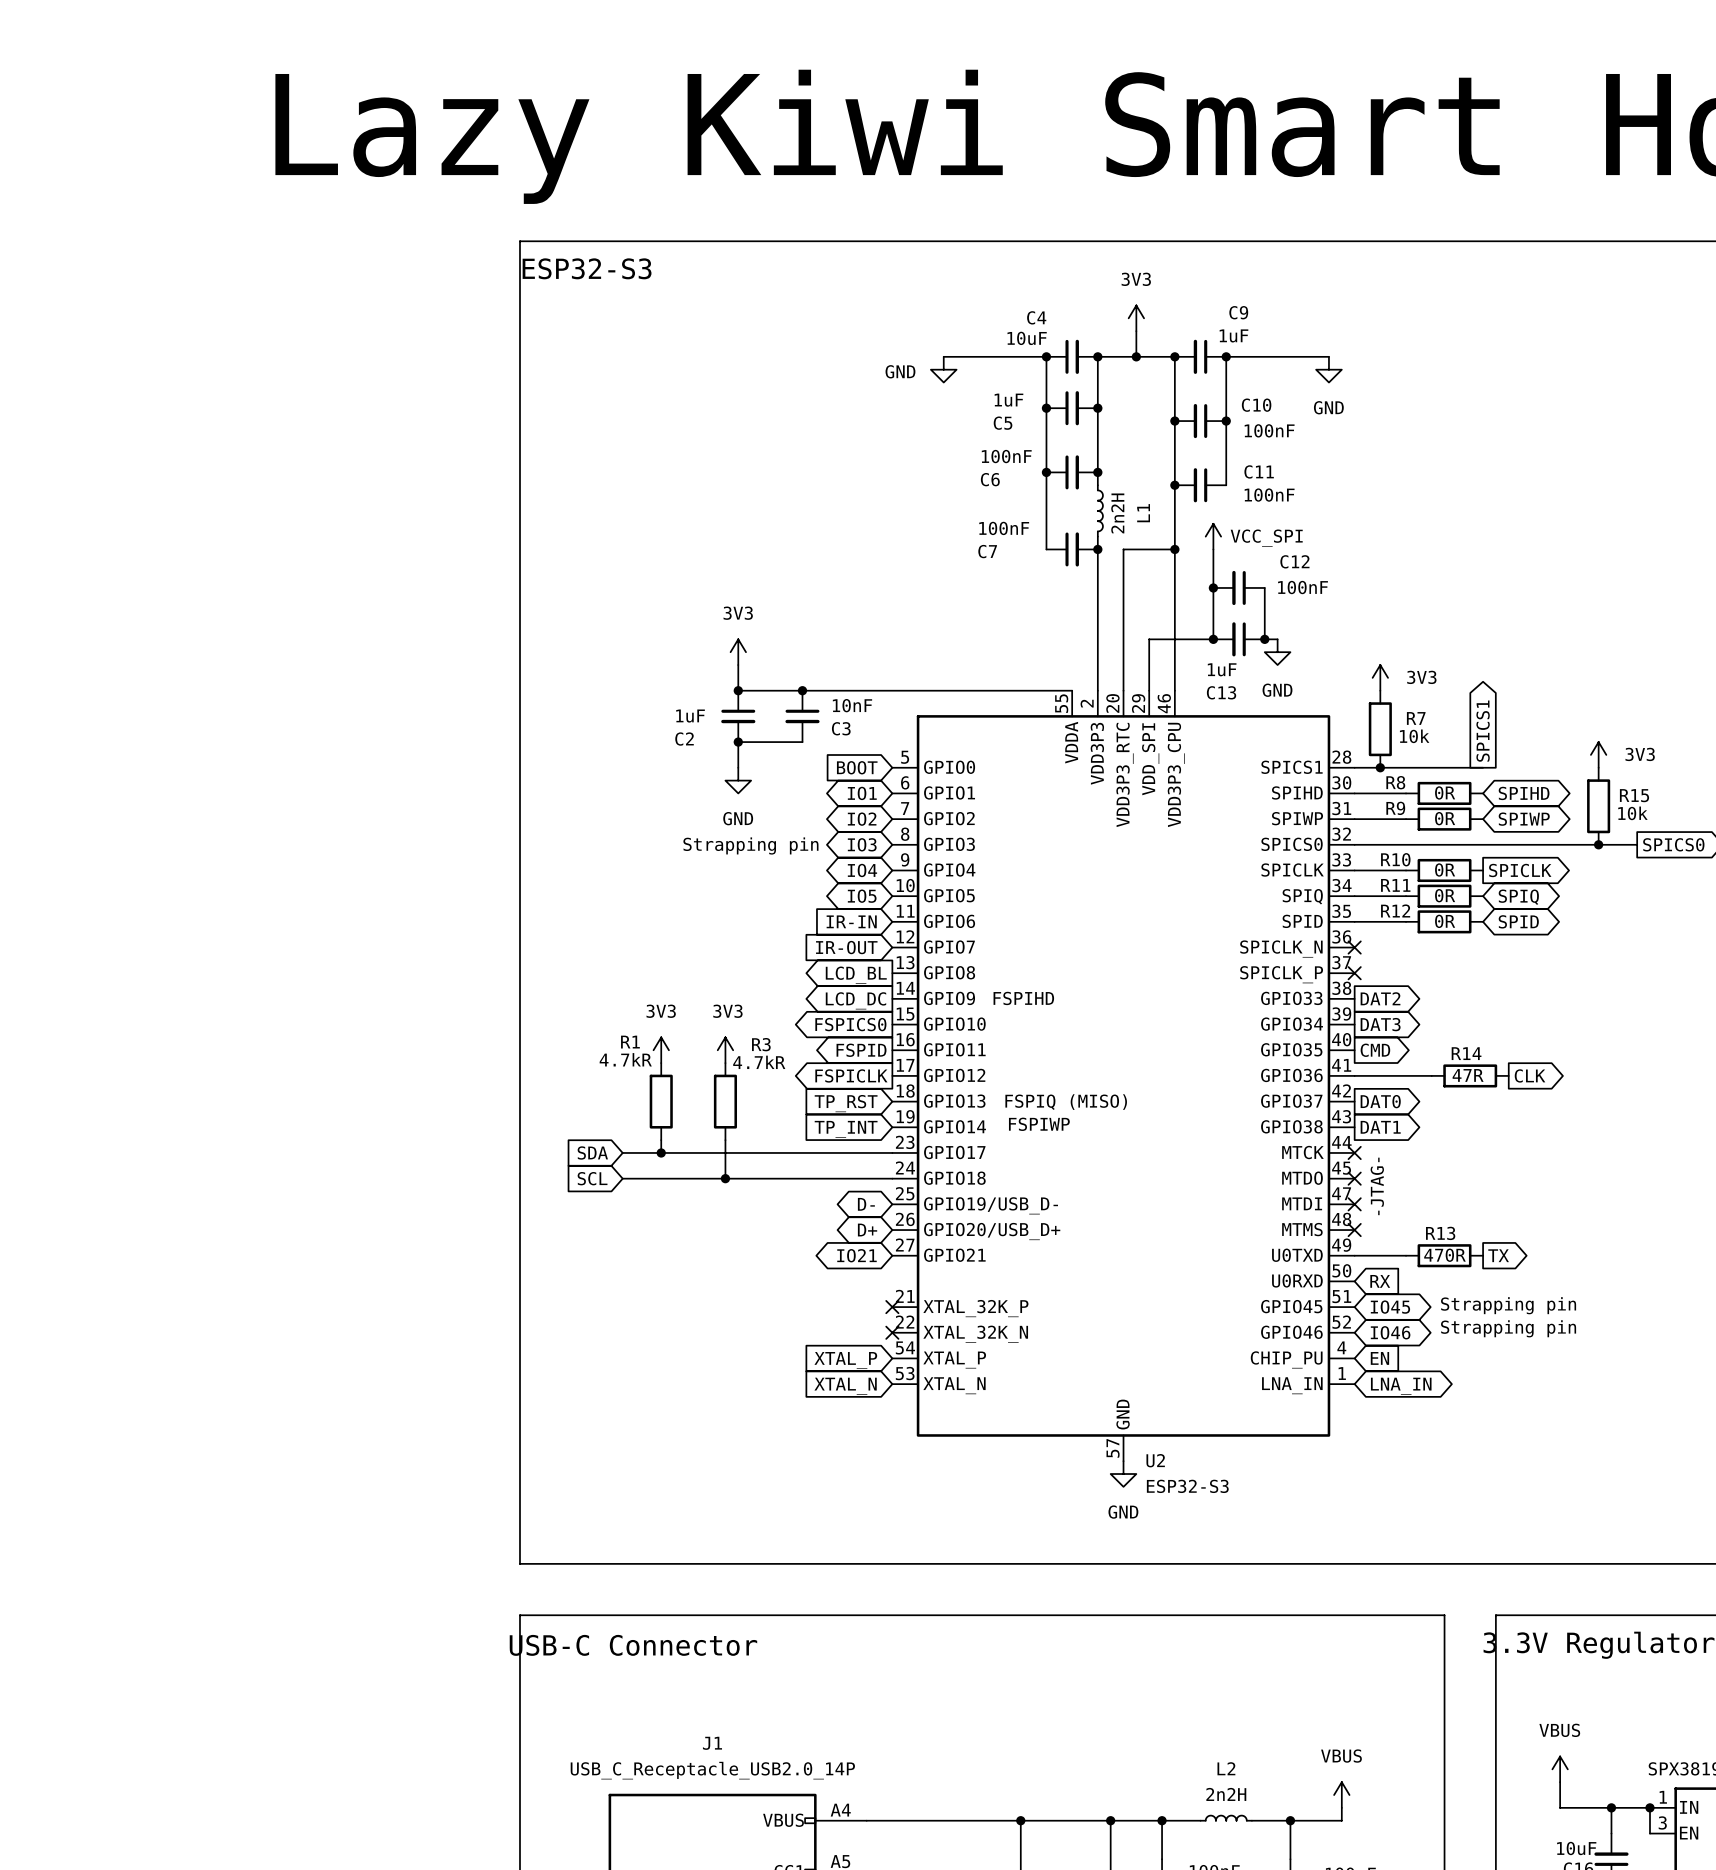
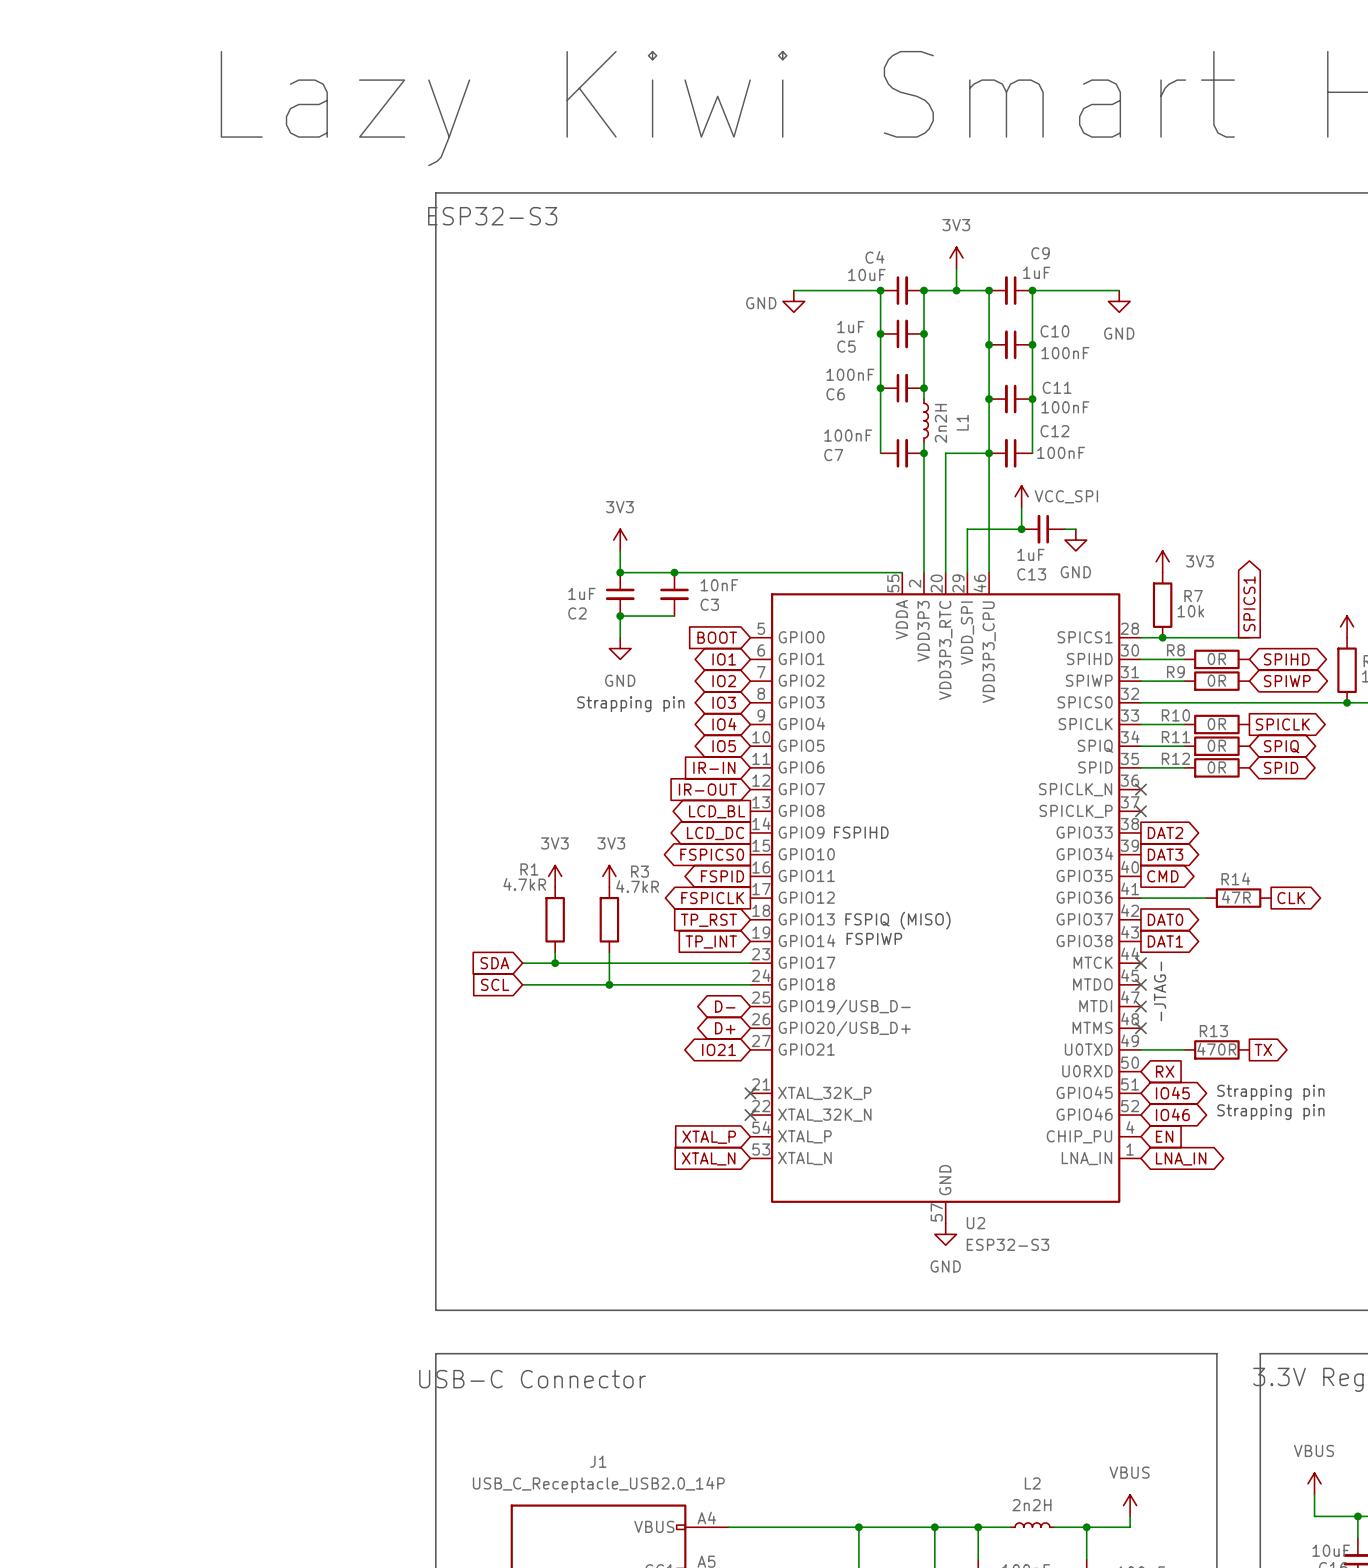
junction: none -> (1032, 399)
power symbol position: VCC_SPI (1213, 536) -> VCC_SPI (1021, 496)
wire: (1213, 549) (1213, 613) -> (1032, 399) (1032, 453)
junction: (1213, 587) -> none
C12 position: (1239, 587) -> (1010, 453)
wire: (1264, 587) (1264, 639) -> none
junction: (1264, 639) -> none

